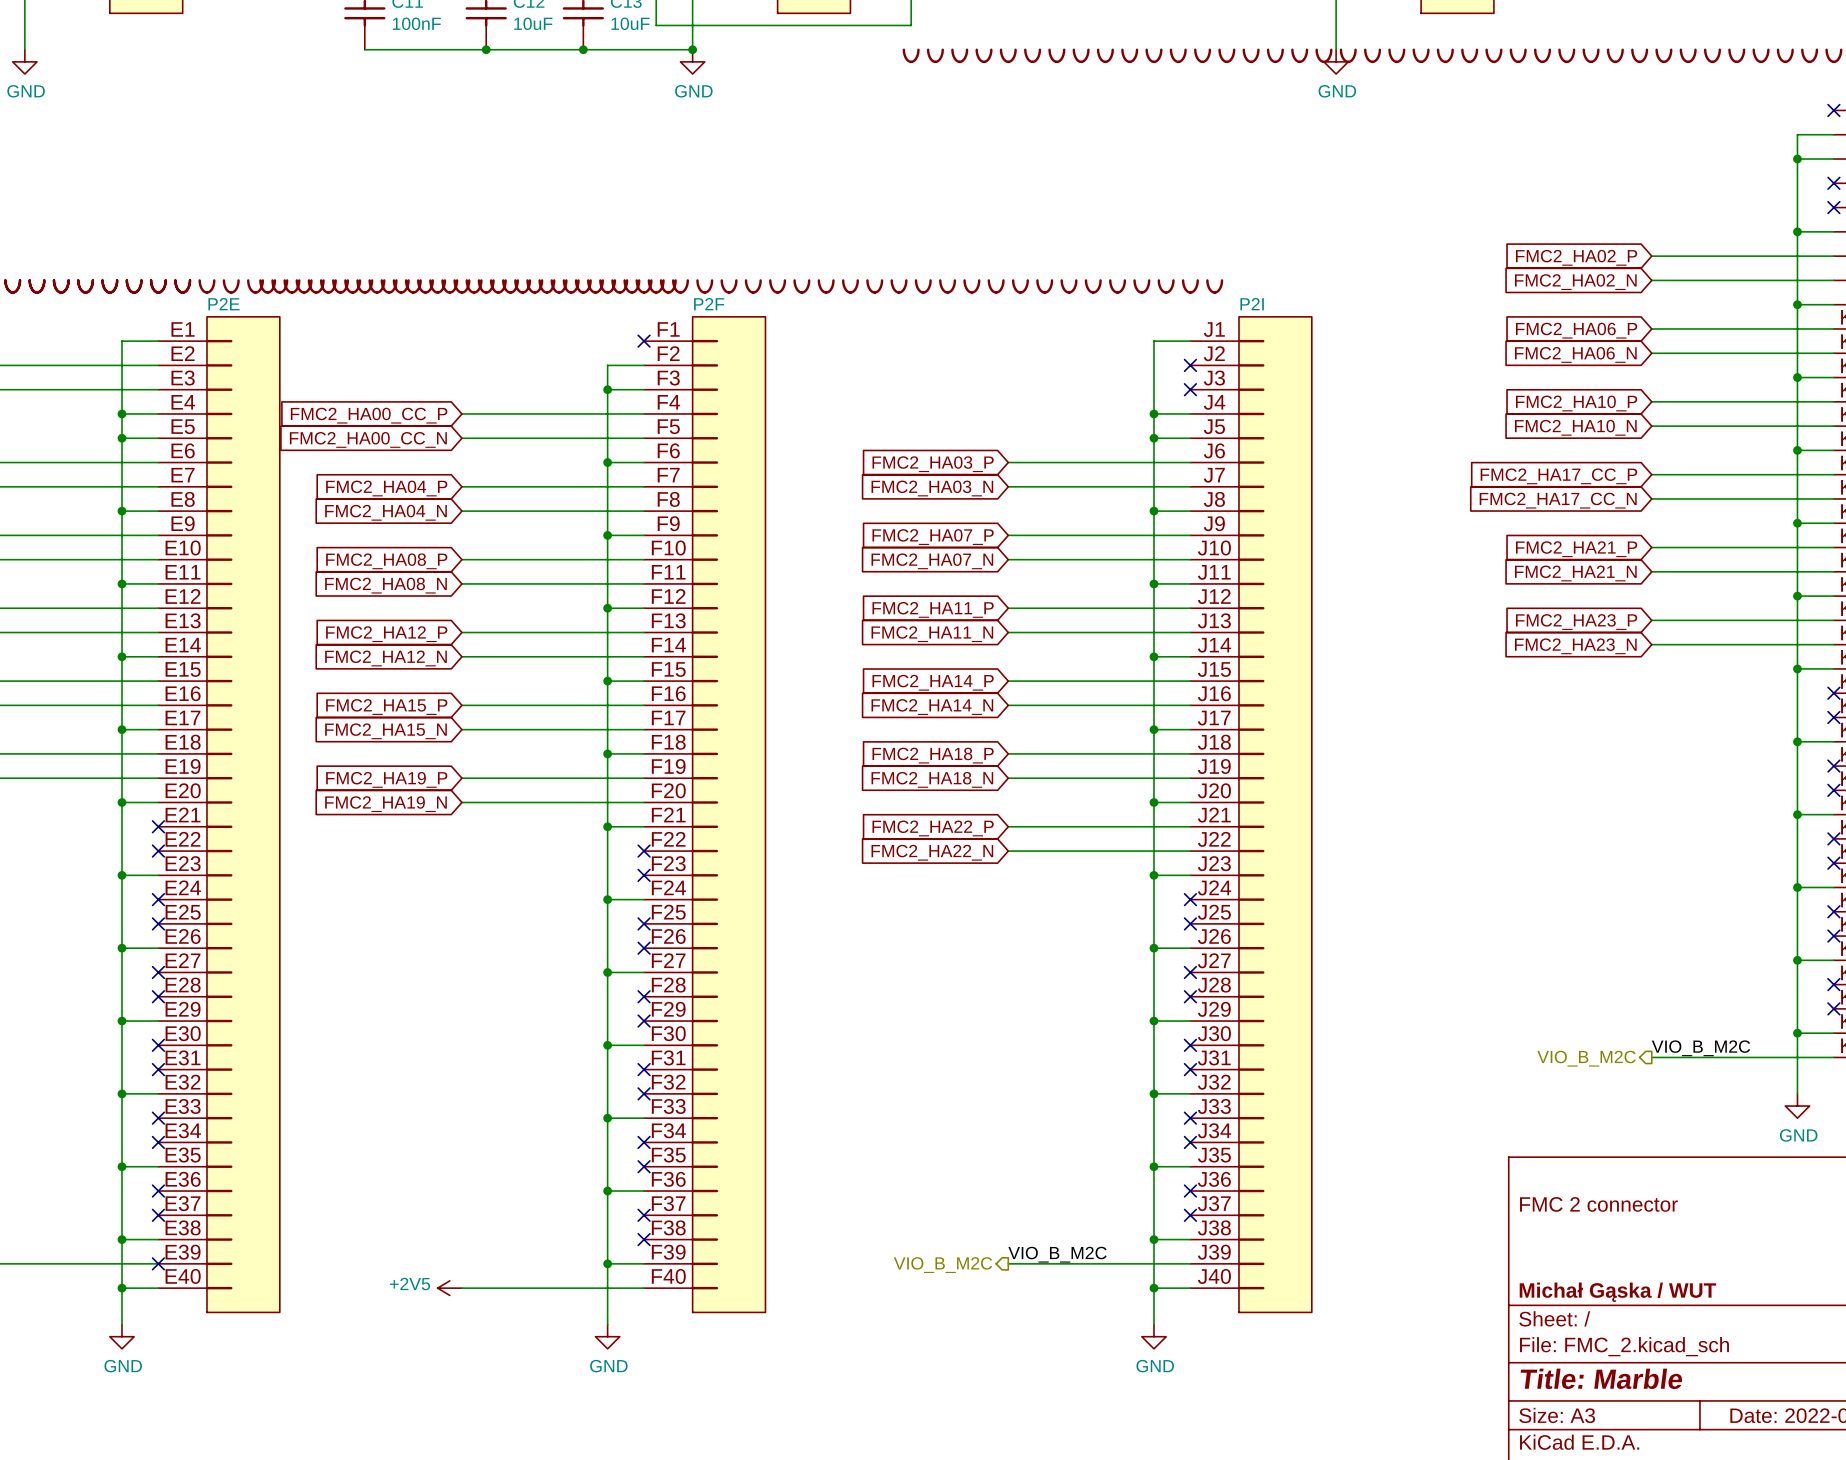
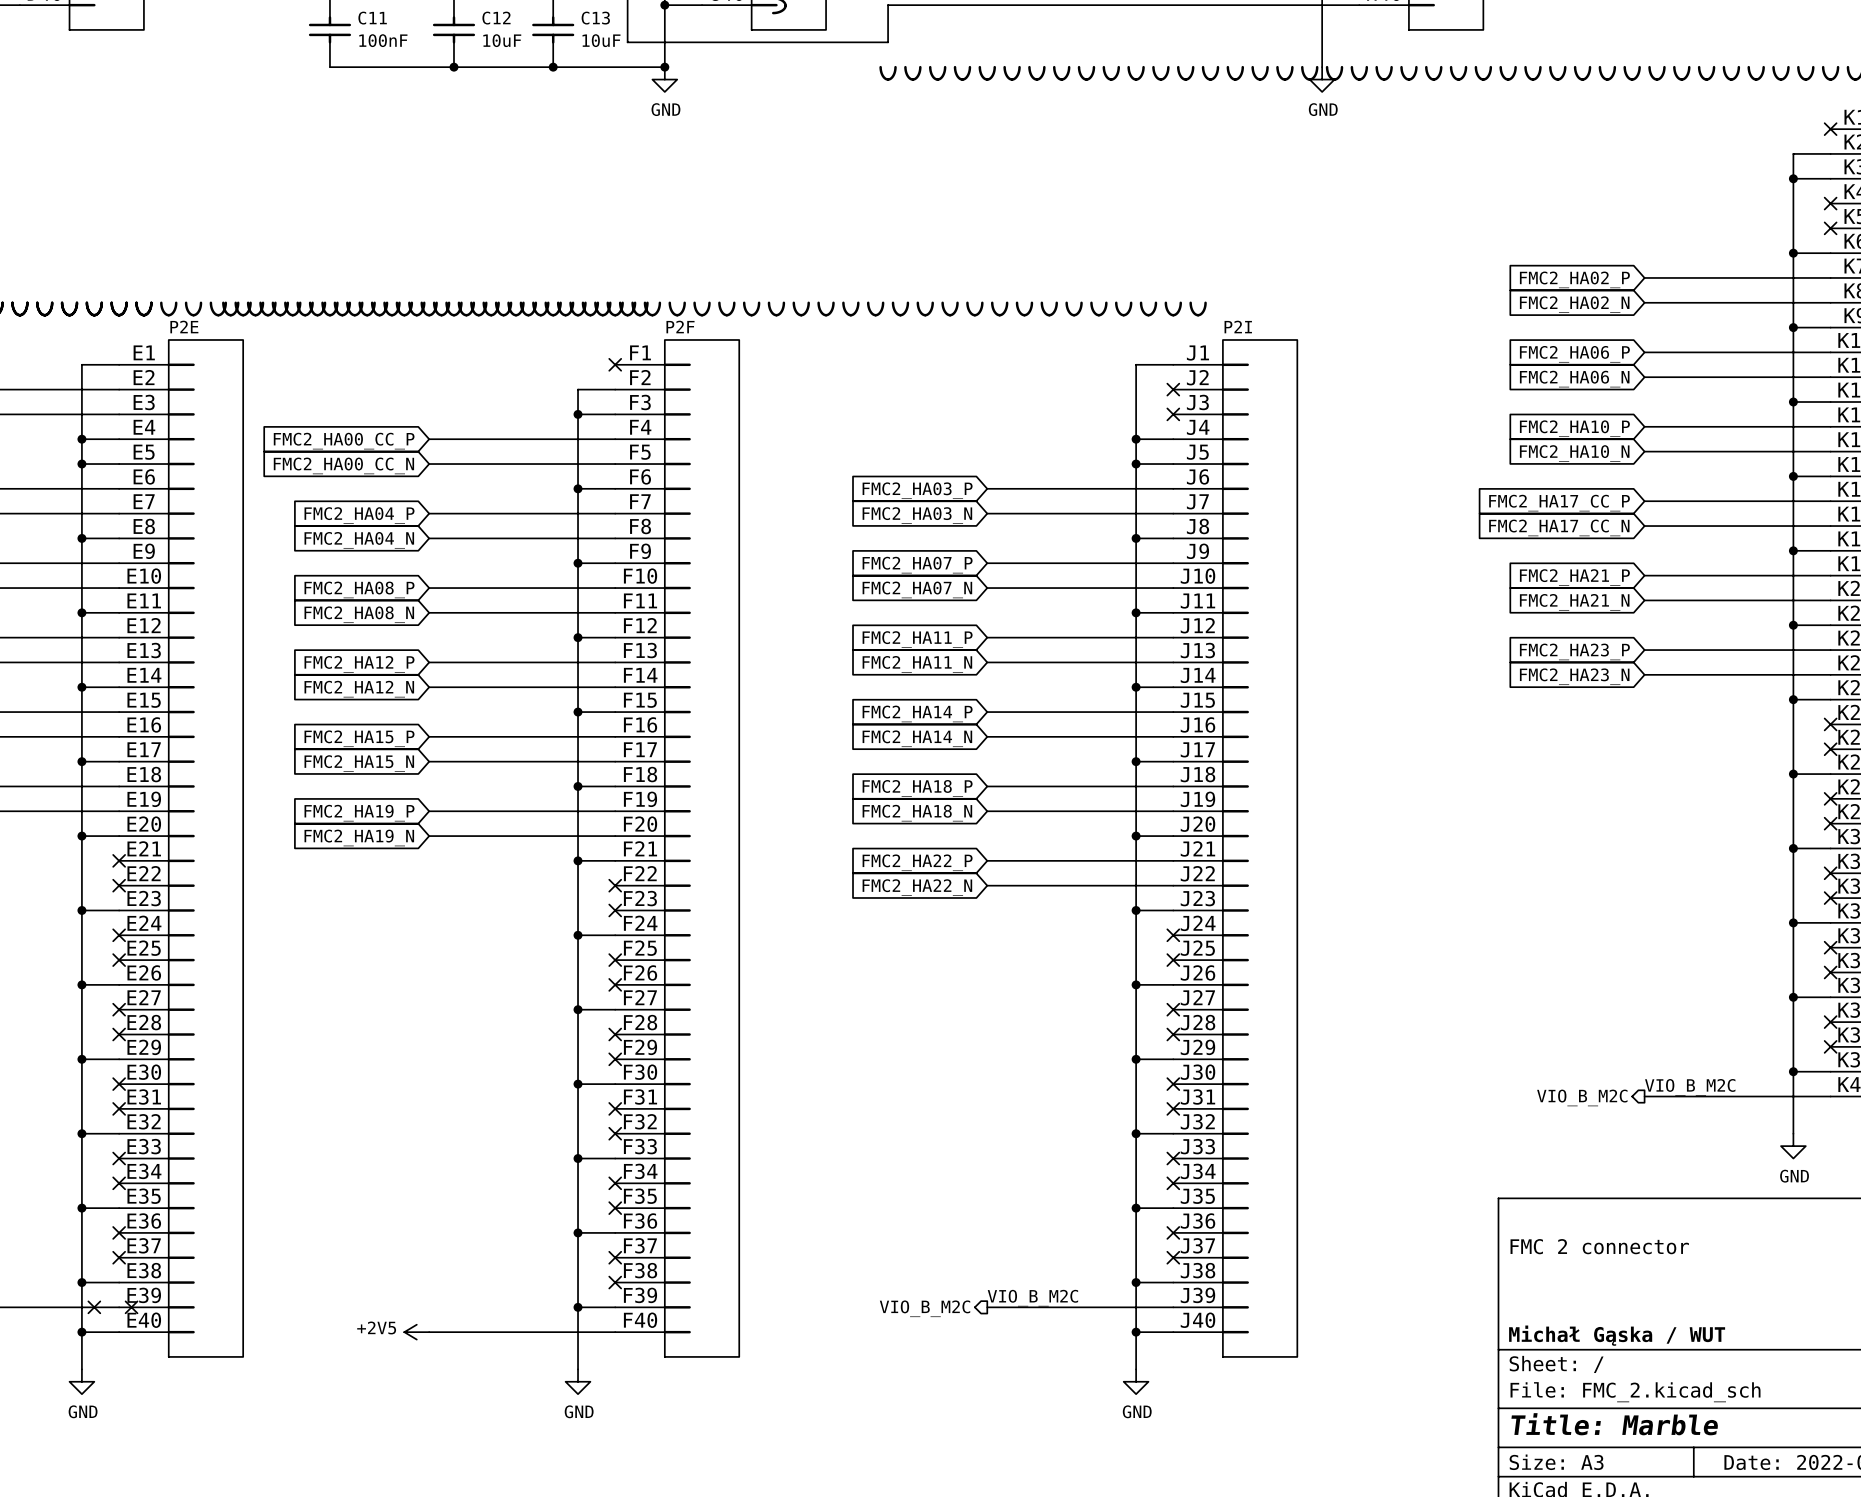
no-connect mark: none -> (94, 1307)
no-connect mark: (158, 1263) -> none
no-connect mark: none -> (131, 1307)

